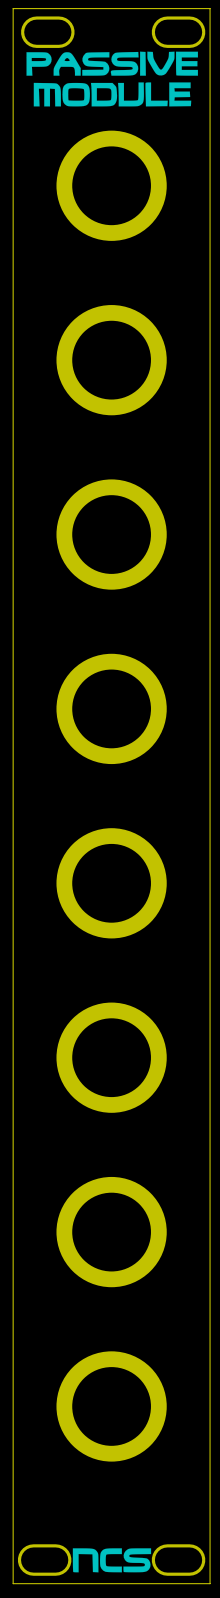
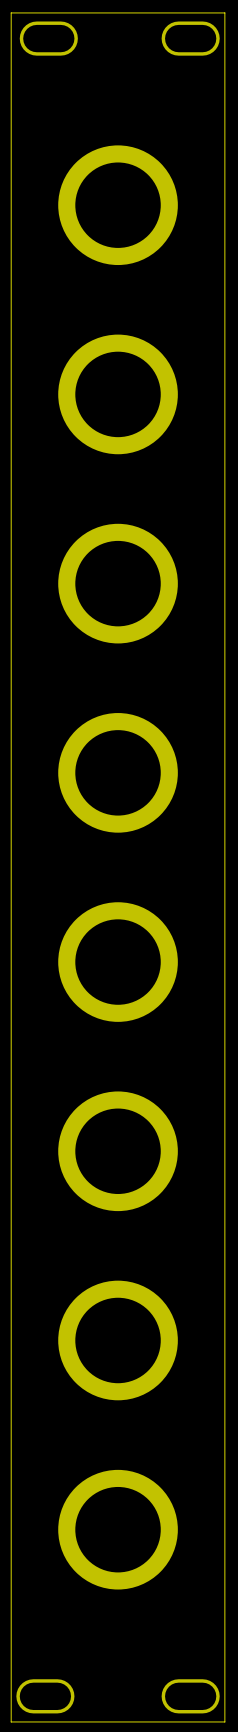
drawing: [26, 51, 198, 1573] -> none

